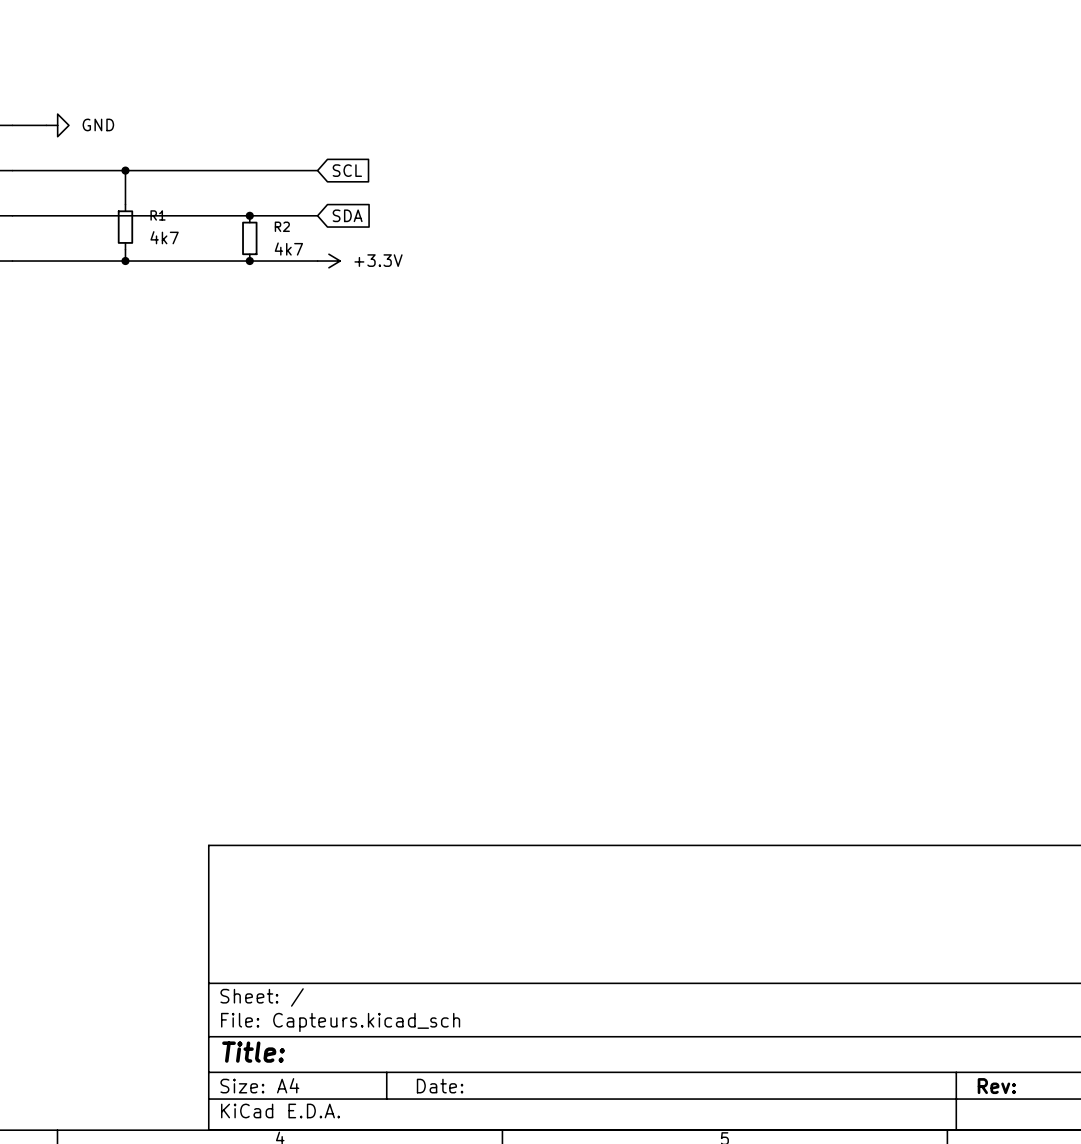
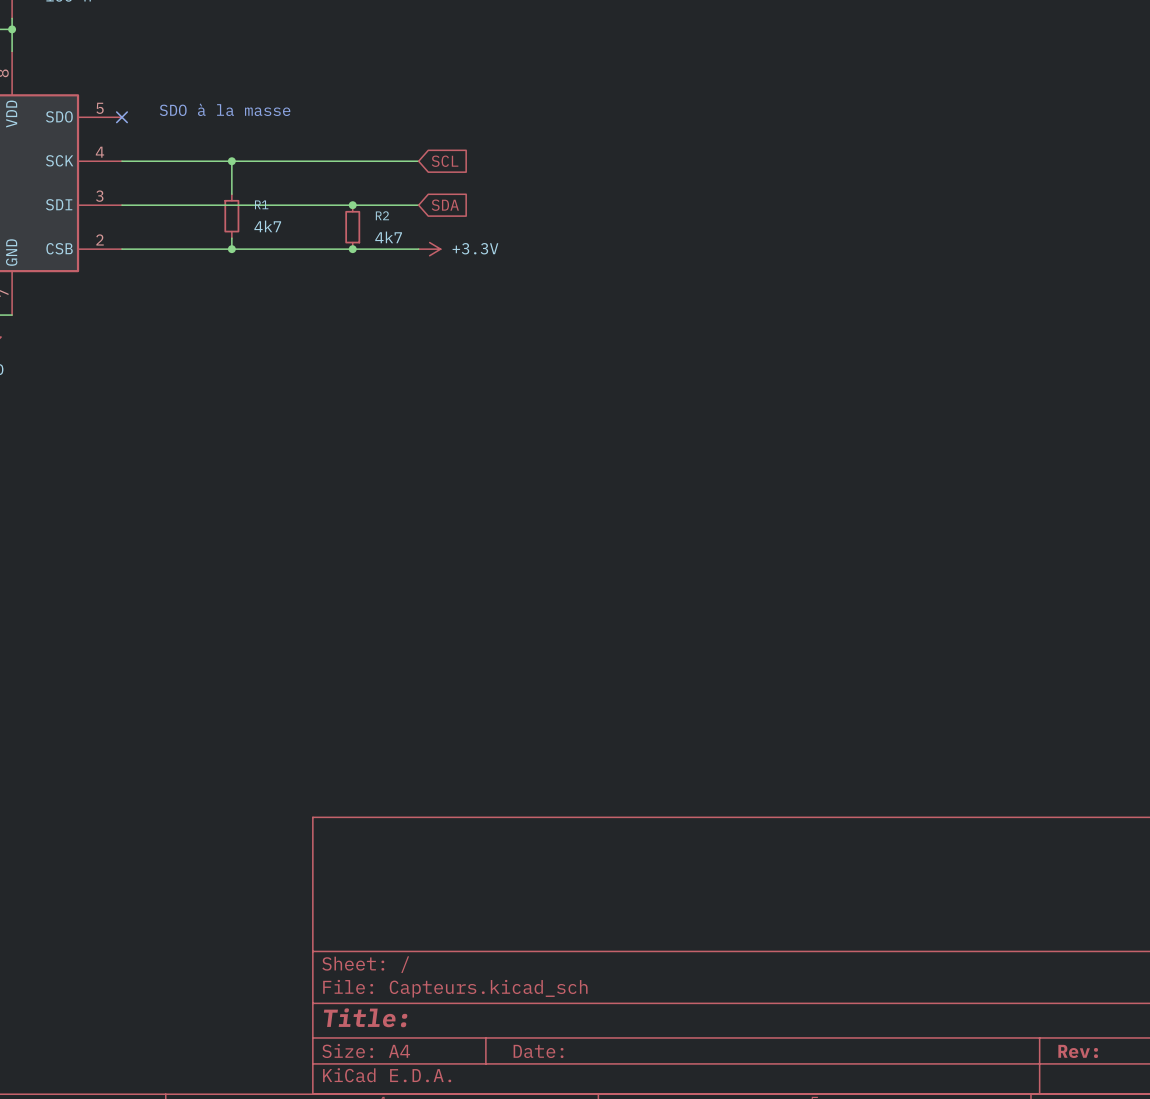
text: none -> SDO à la masse (225, 109)
wire: (12, 125) (46, 125) -> none
no-connect mark: none -> (121, 117)
power symbol: GND (57, 125) -> none

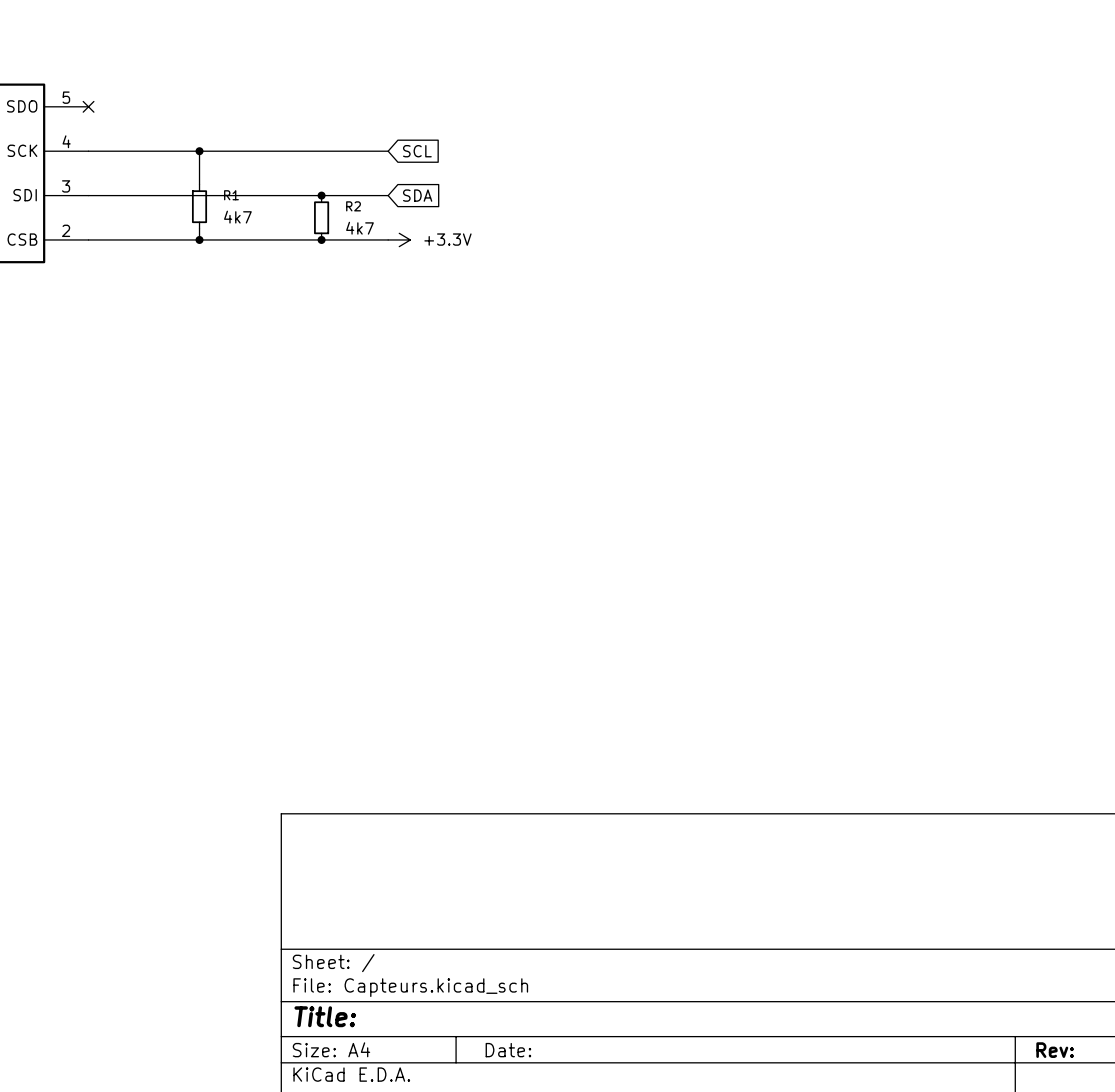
text: SDO à la masse (225, 109) -> none

